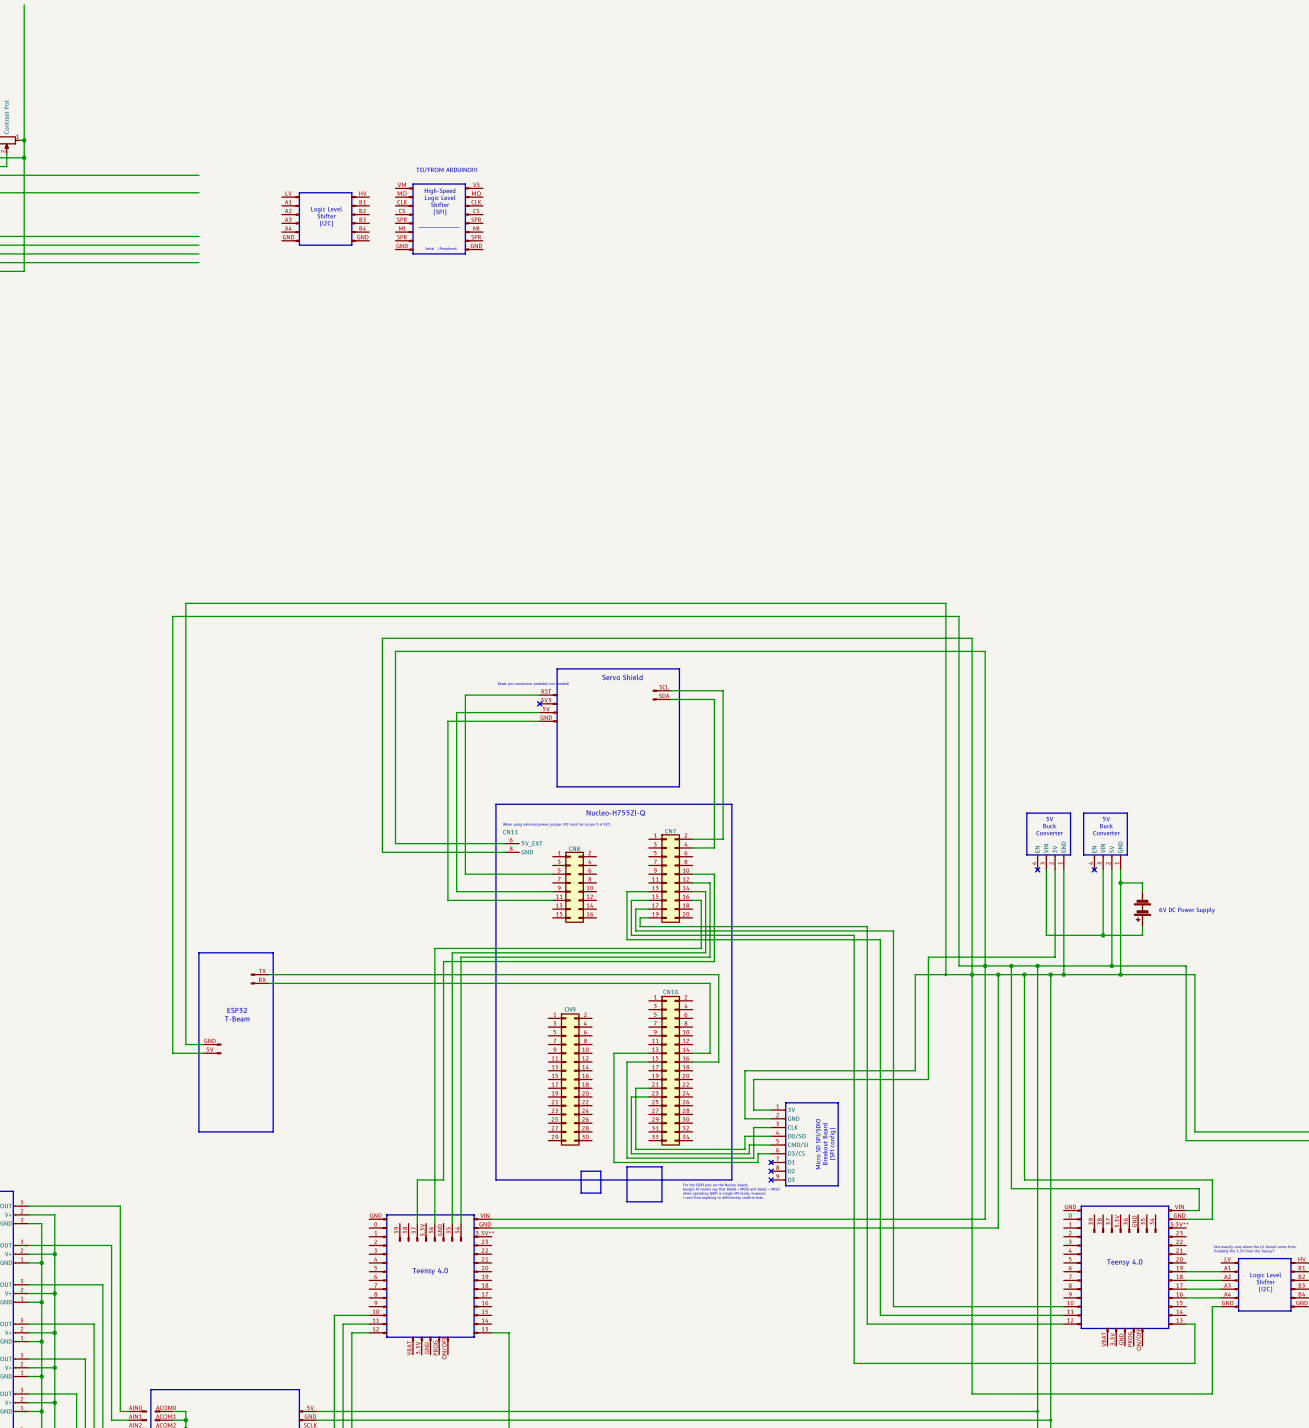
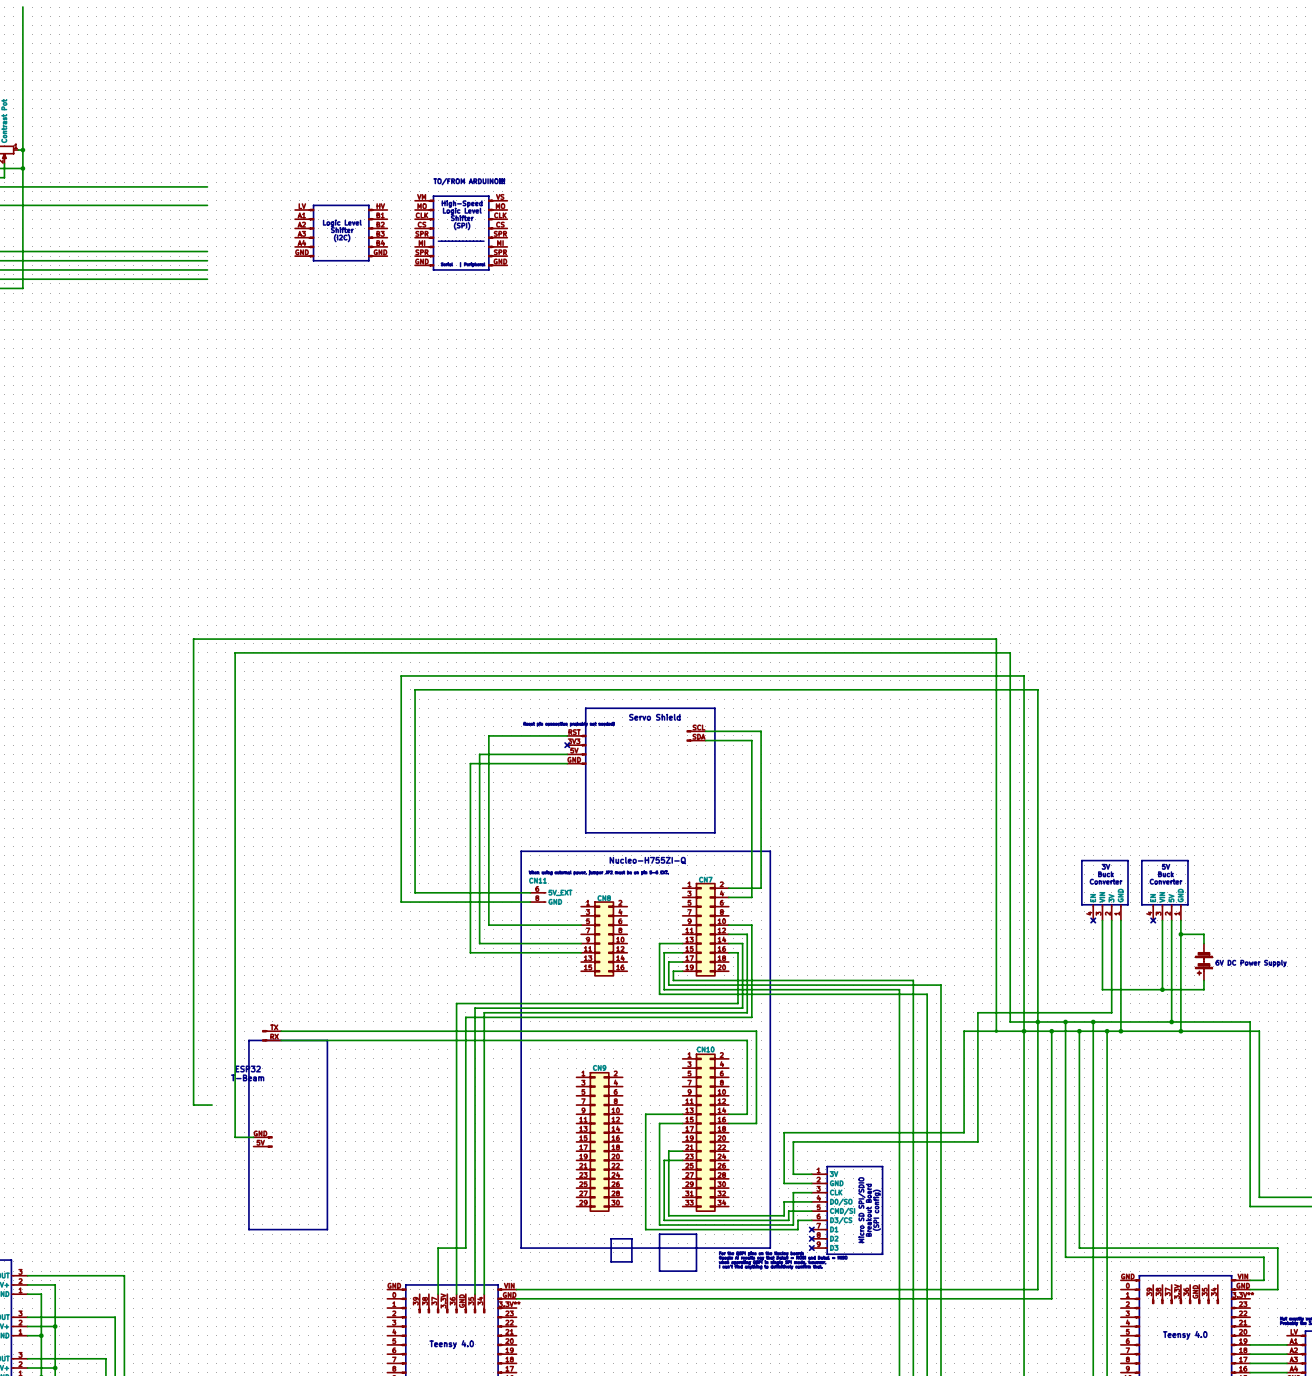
wire: (225, 616) (172, 616) (172, 1053) (203, 1053) -> (235, 652) (235, 1137) (253, 1137)
line: (198, 952) (273, 952) (273, 1131) (198, 1131) (198, 952) -> (248, 1040) (327, 1040) (327, 1229) (248, 1229) (248, 1040)
part position: (212, 1048) -> (262, 1141)

